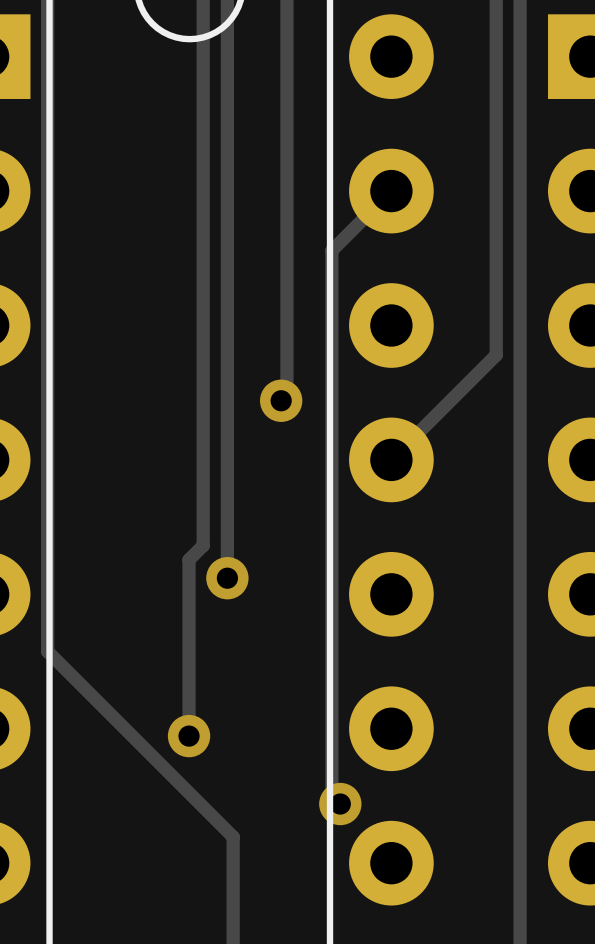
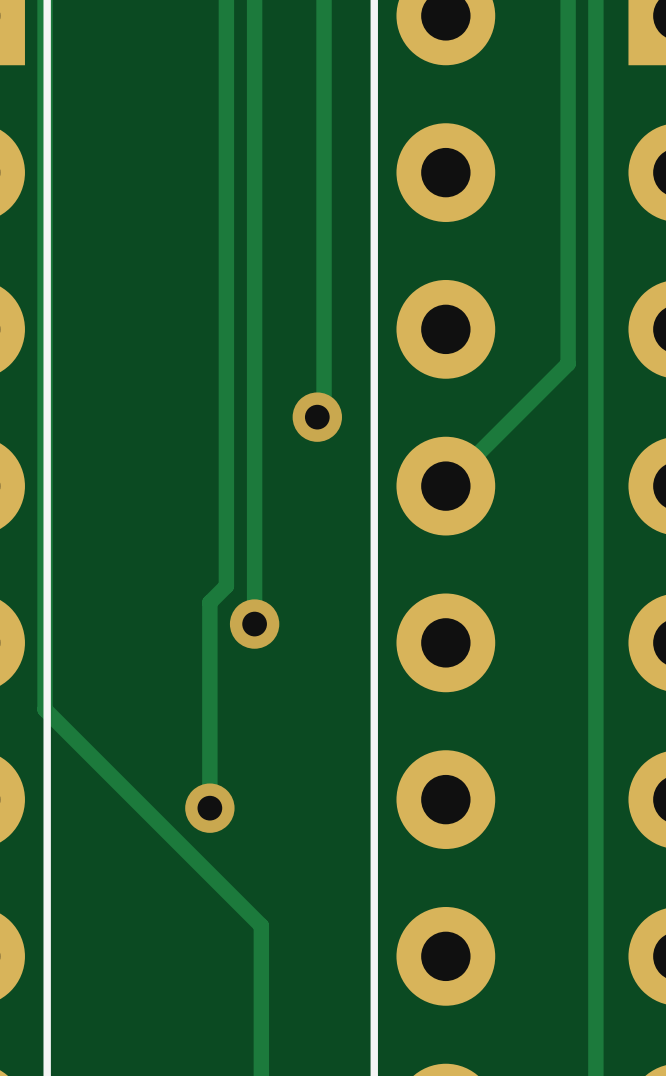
track: (391, 191) (331, 250) (331, 795) (340, 804) -> none
via: (340, 804) -> none

